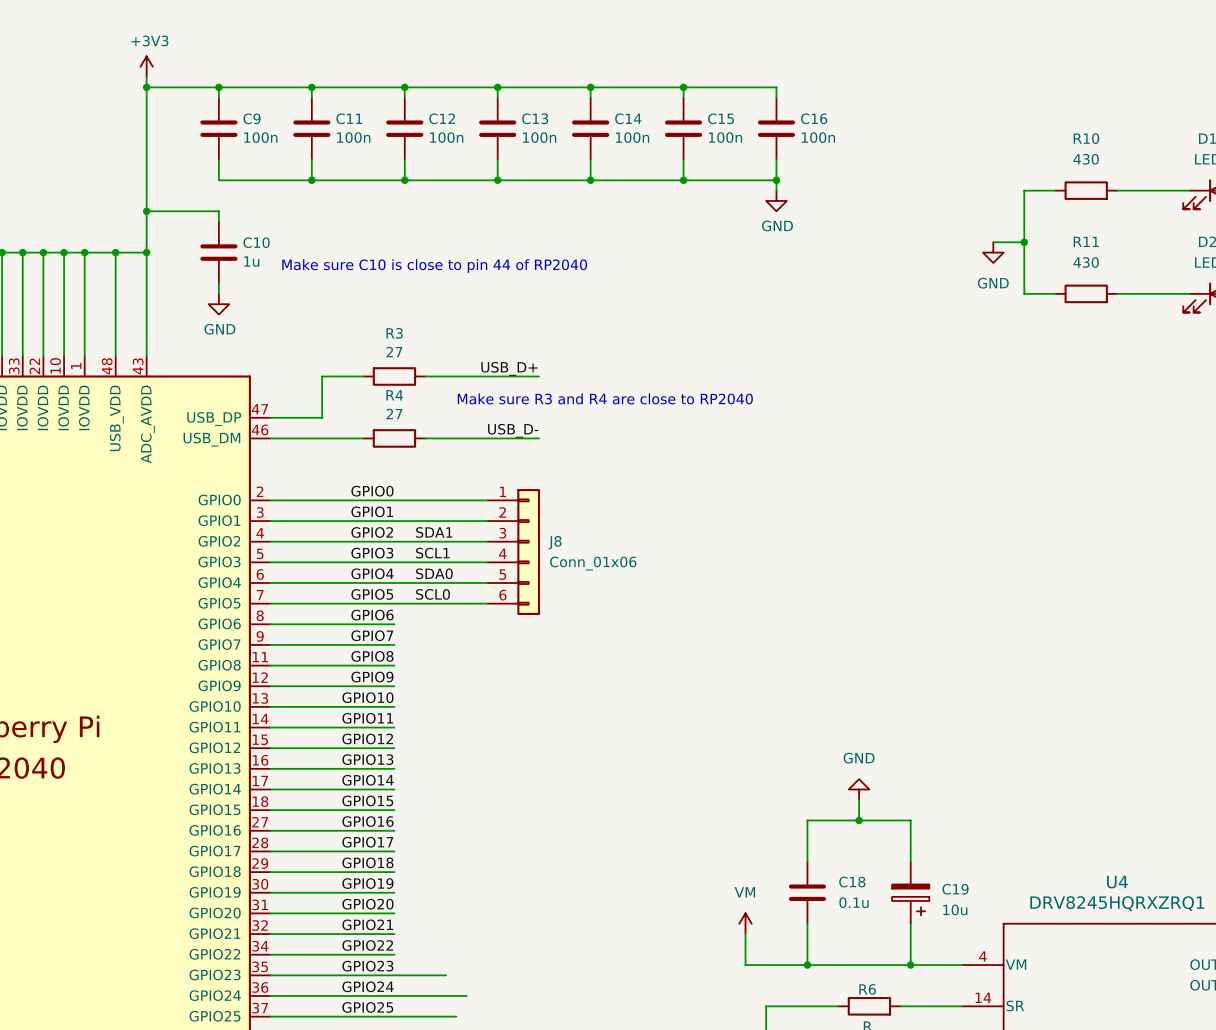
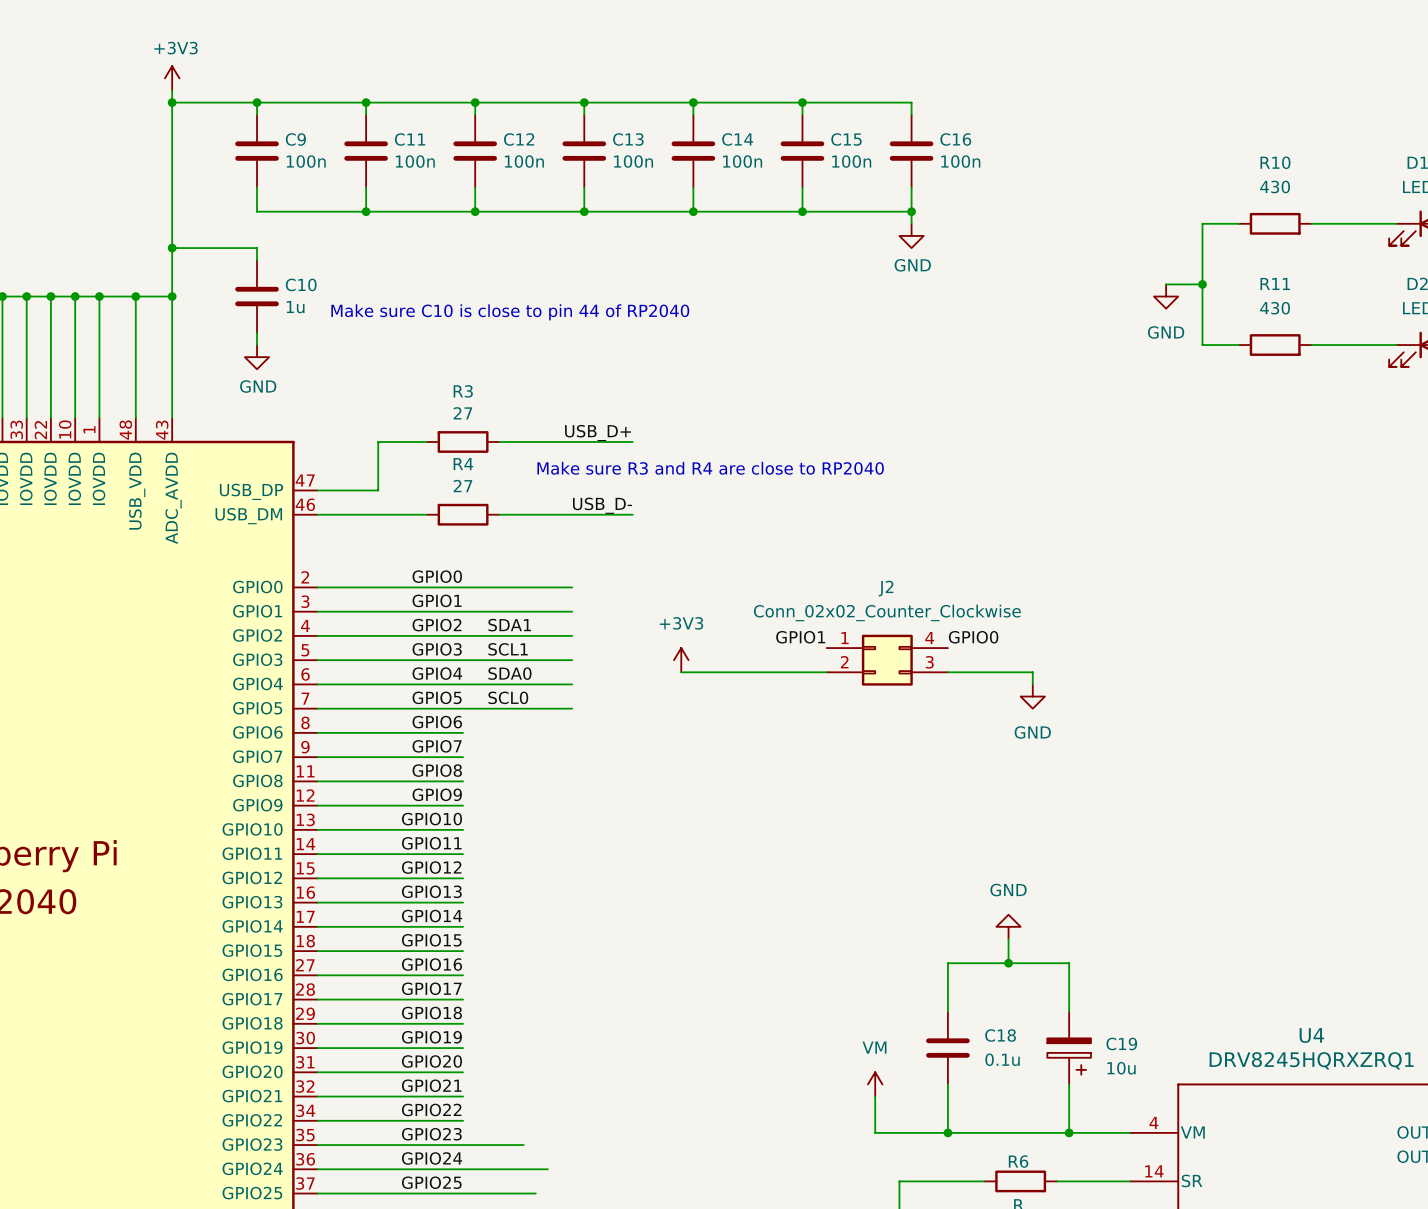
label: none -> GPIO1 (800, 637)
label: none -> GPIO0 (973, 637)
J8: Conn_01x06 (513, 552) -> none
power symbol: none -> +3V3 (681, 660)
J2: none -> Conn_02x02_Counter_Clockwise (887, 660)
wire: none -> (681, 672) (826, 672)
wire: none -> (947, 672) (1032, 672) (1032, 684)
power symbol: none -> GND (1032, 696)

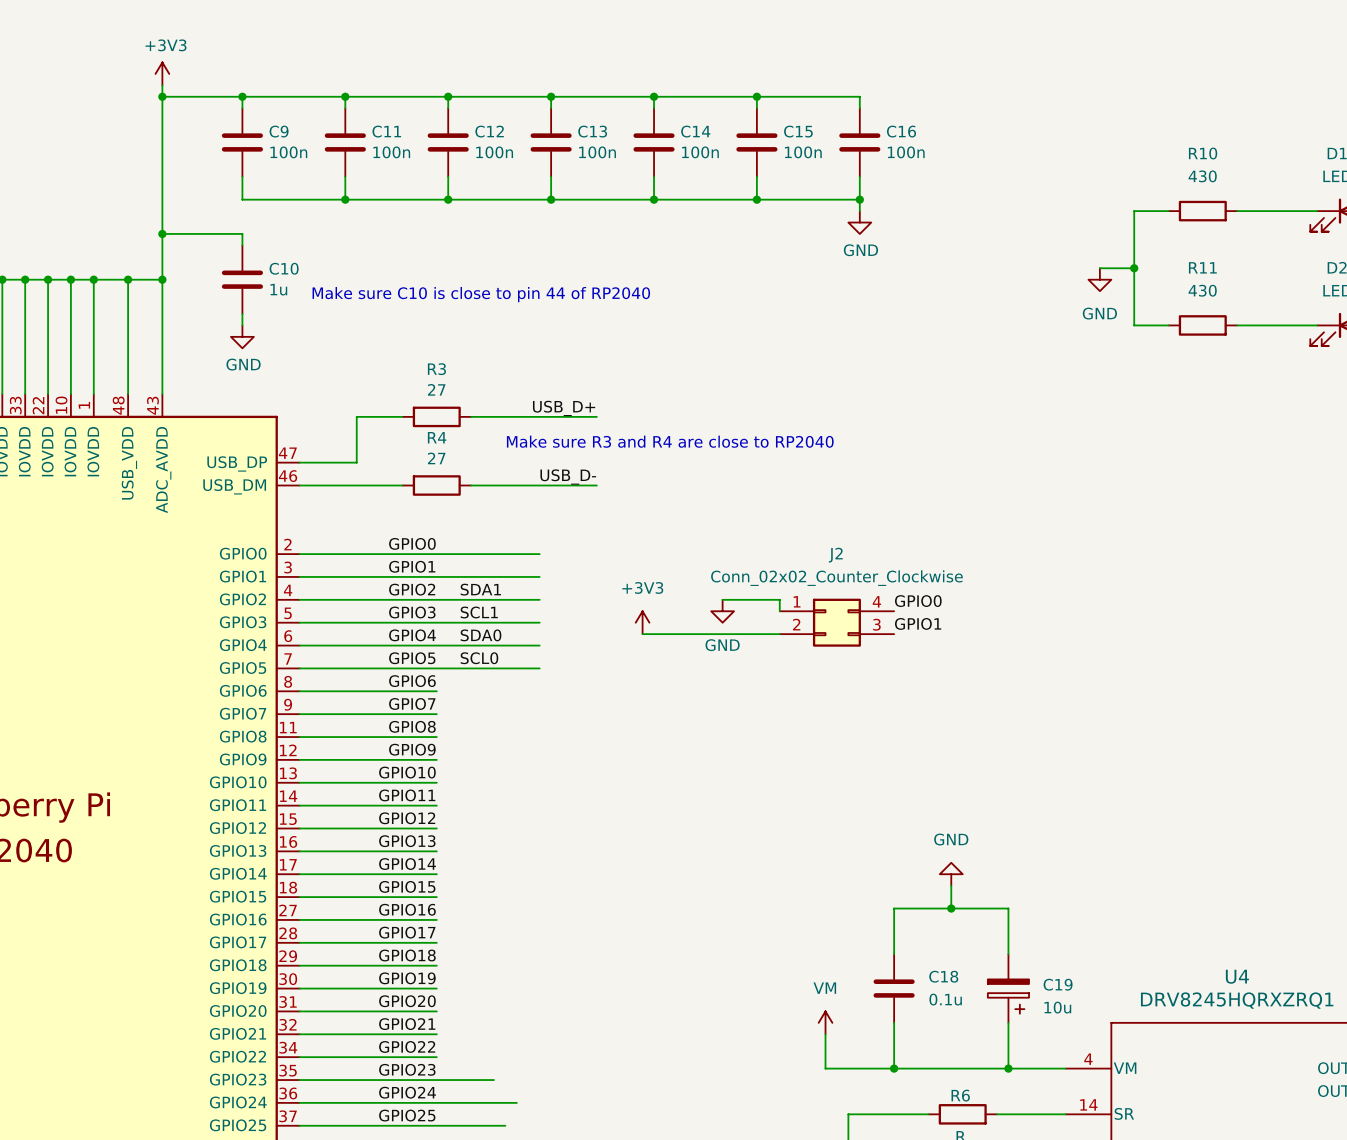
wire: none -> (722, 599) (779, 599) (779, 611)
label position: GPIO1 (800, 637) -> GPIO1 (918, 623)
power symbol: none -> GND (722, 611)
wire: (947, 672) (1032, 672) (1032, 684) -> none
power symbol: GND (1032, 696) -> none

